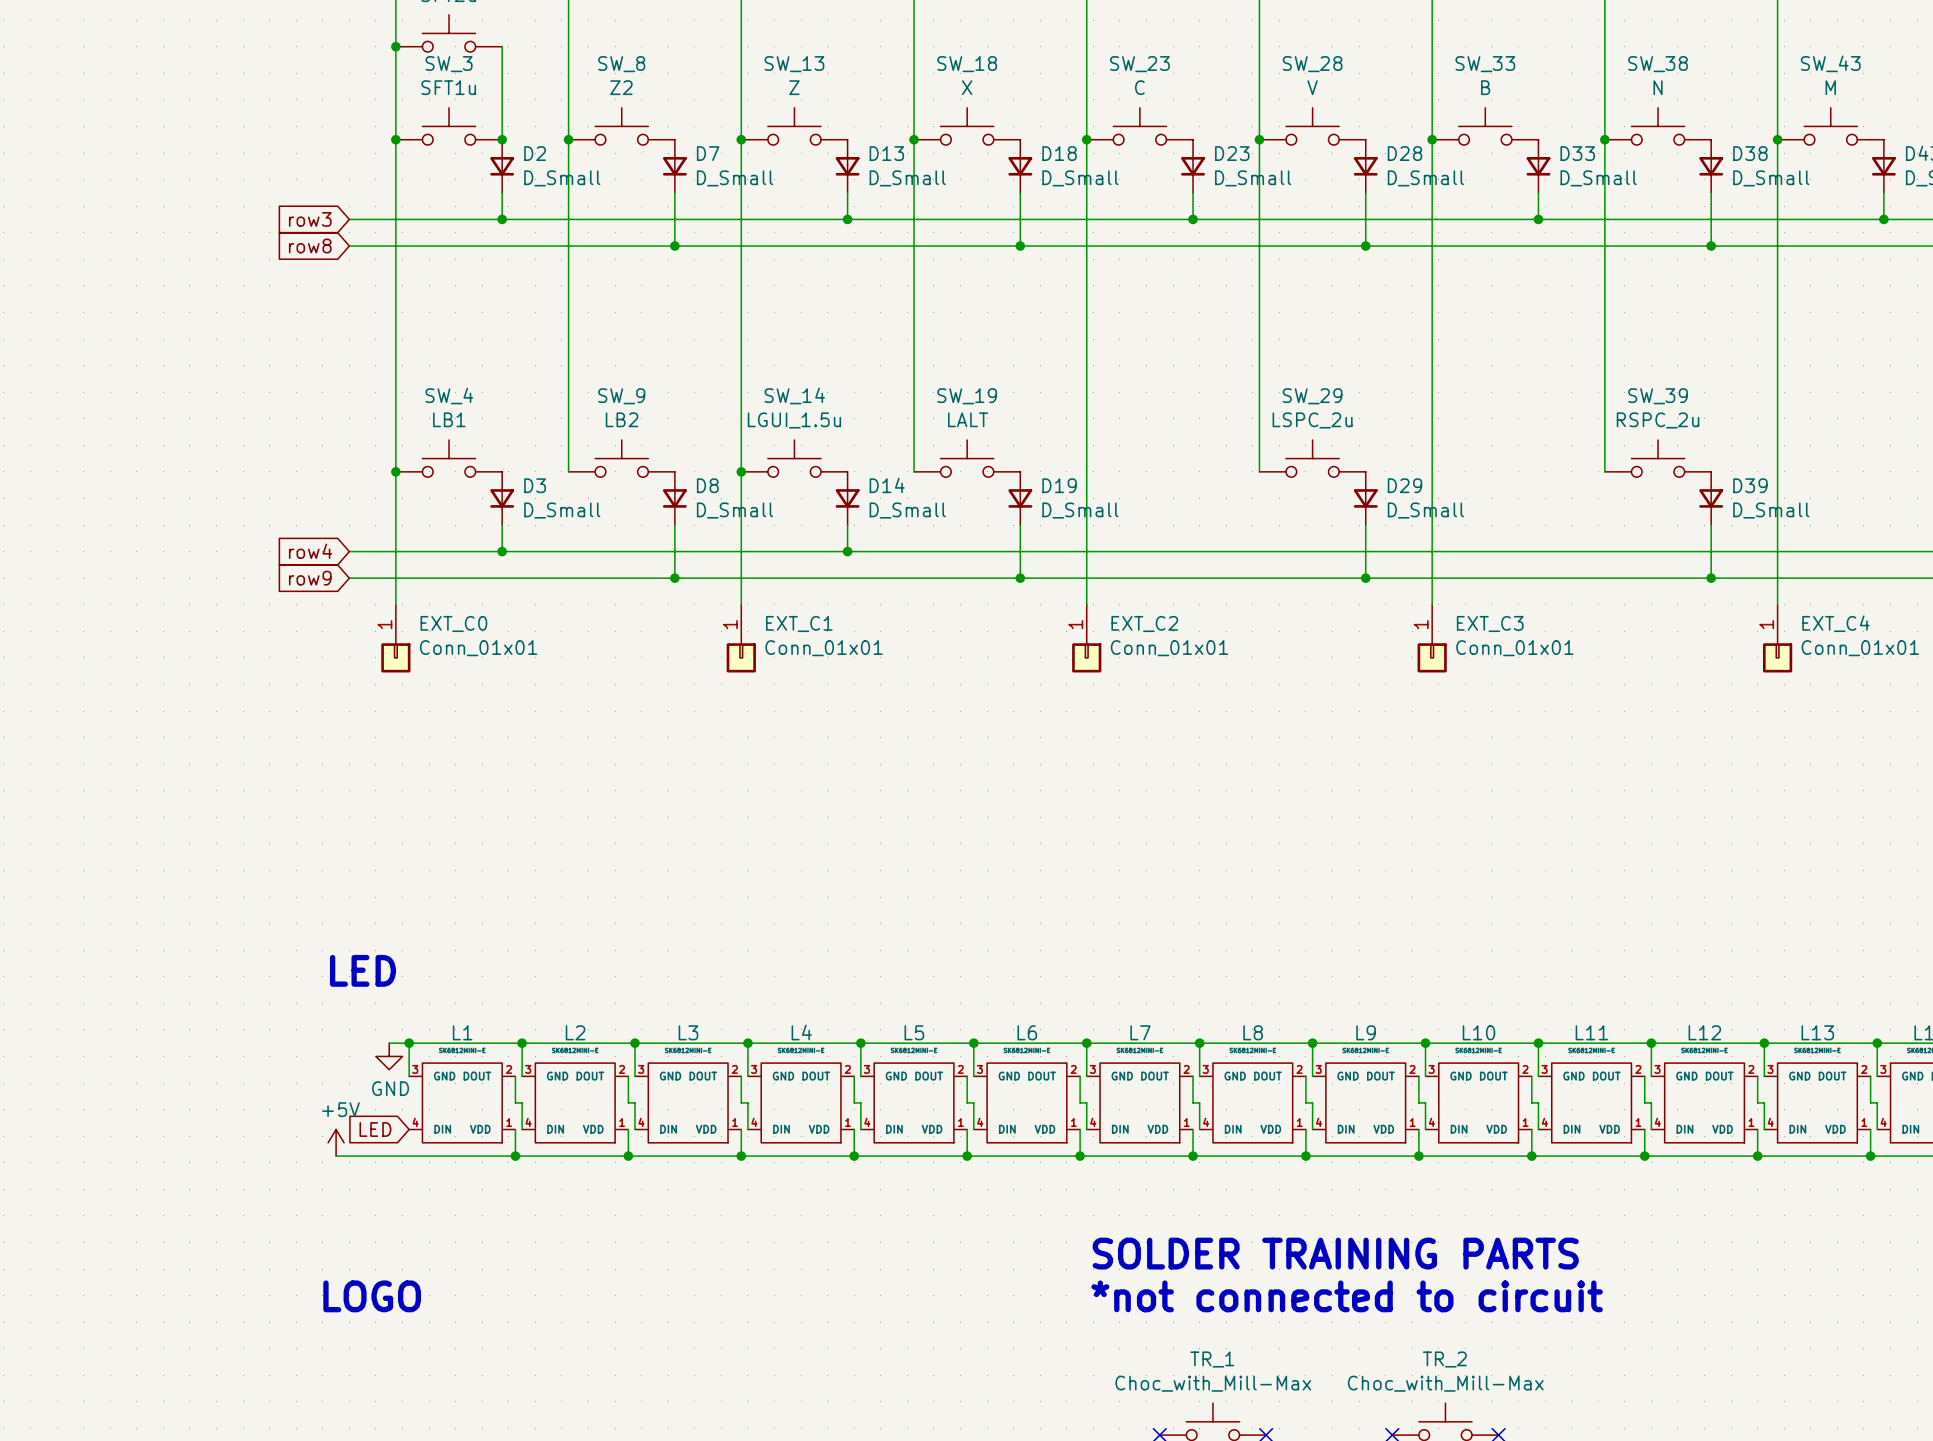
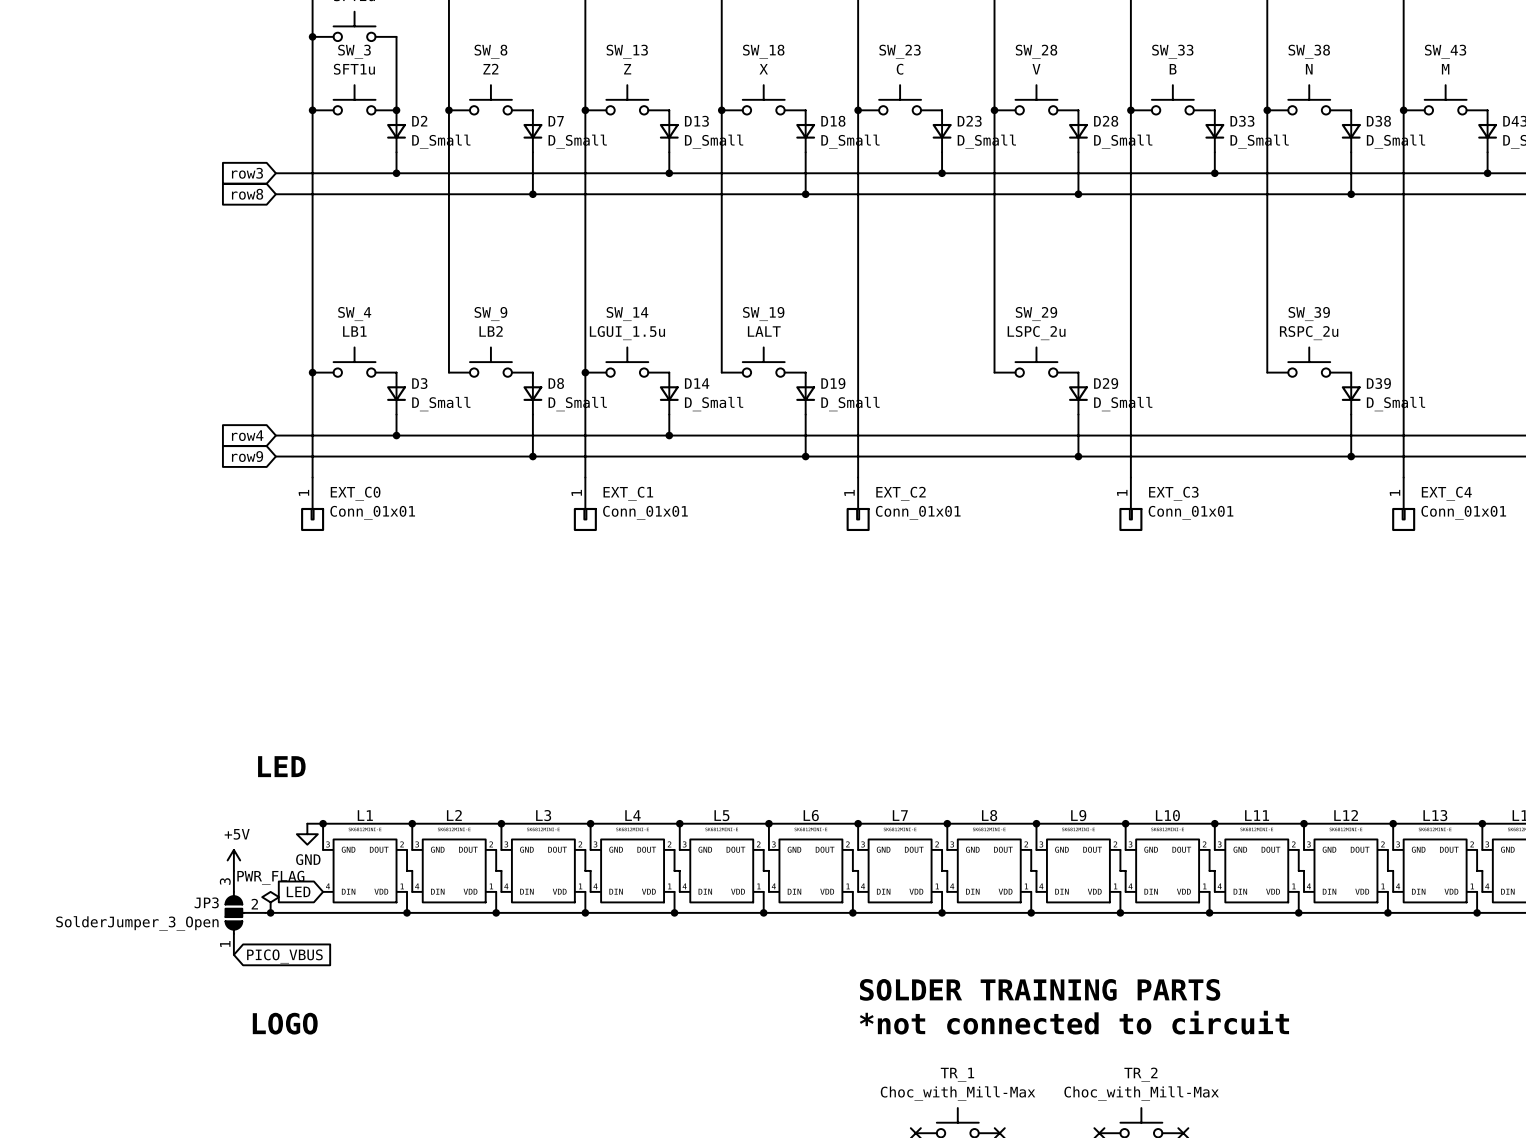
power symbol: none -> +5V (233, 860)
power symbol: +5V (336, 1142) -> PWR_FLAG (270, 902)
JP3: none -> SolderJumper_3_Open (245, 912)
junction: none -> (270, 912)
global label: none -> PICO_VBUS (284, 956)

